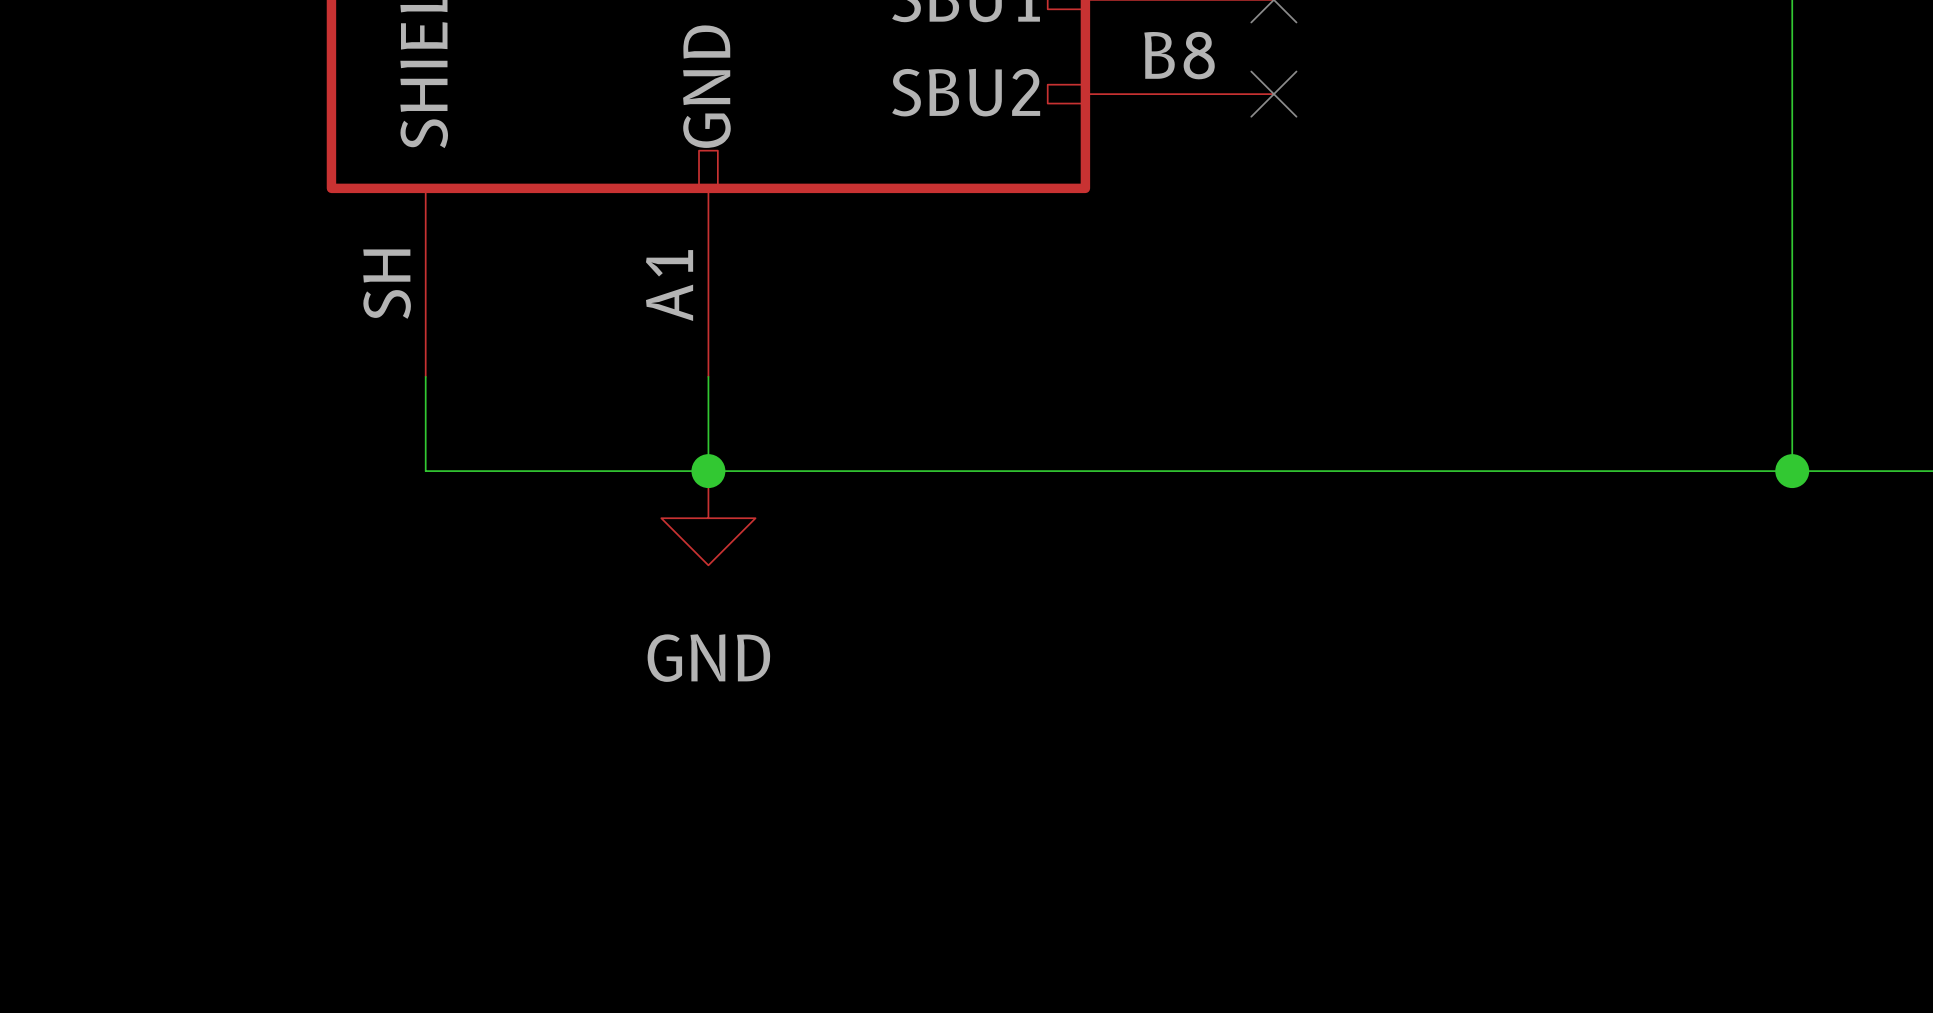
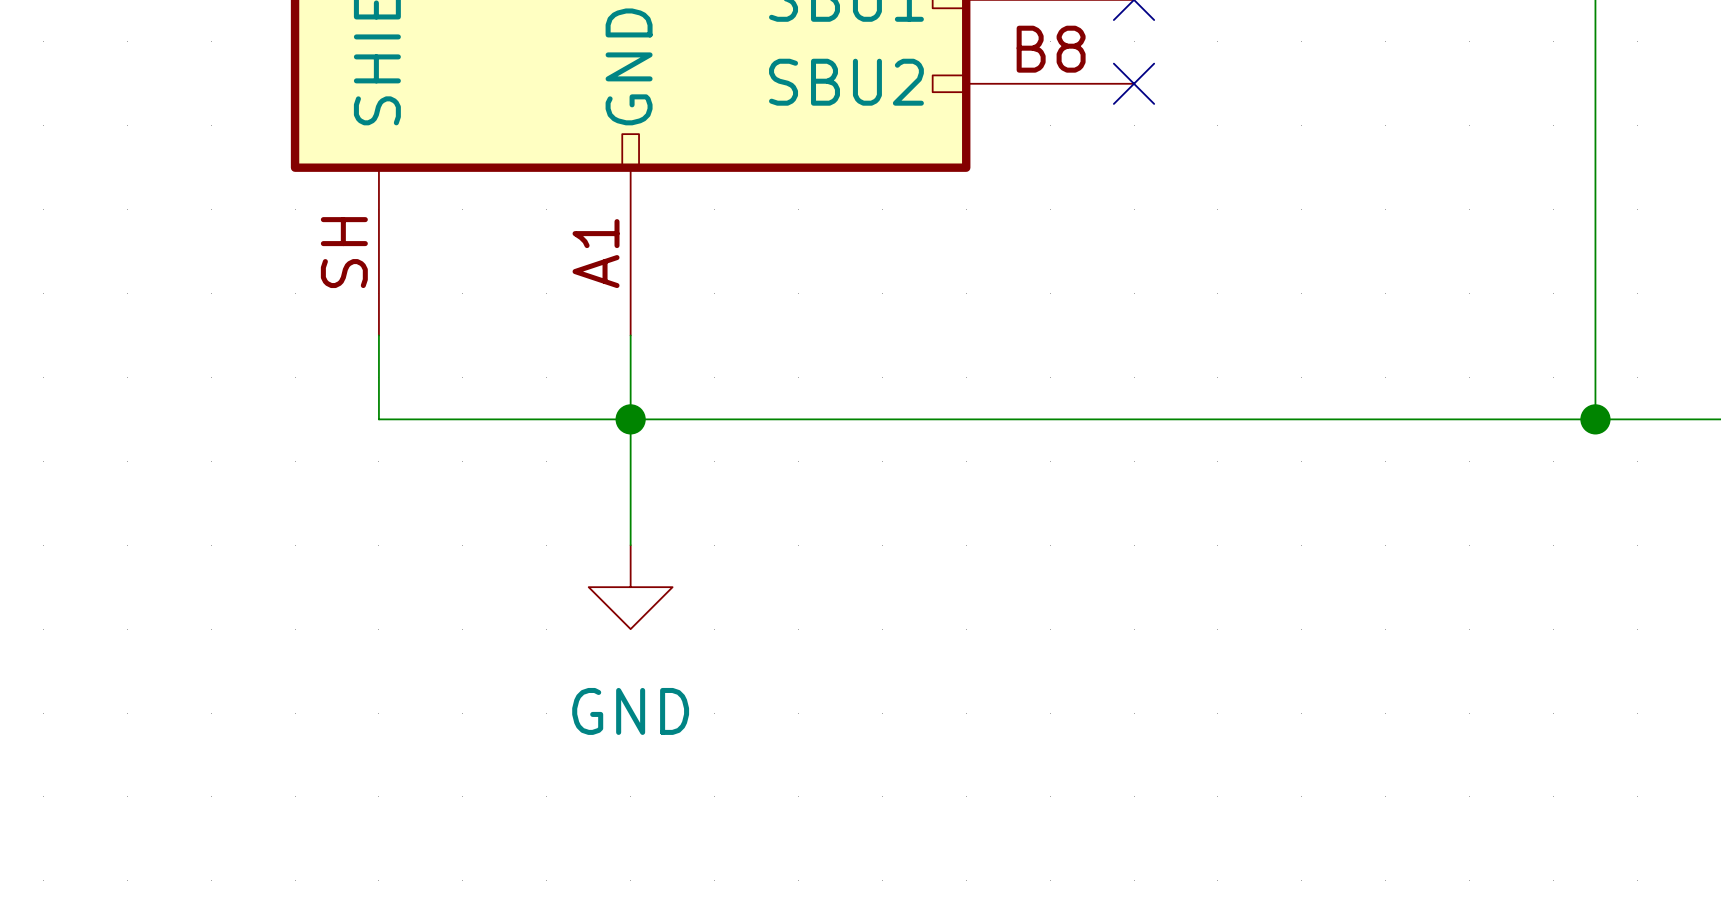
wire: none -> (630, 419) (630, 545)
power symbol position: GND (708, 518) -> GND (630, 587)

